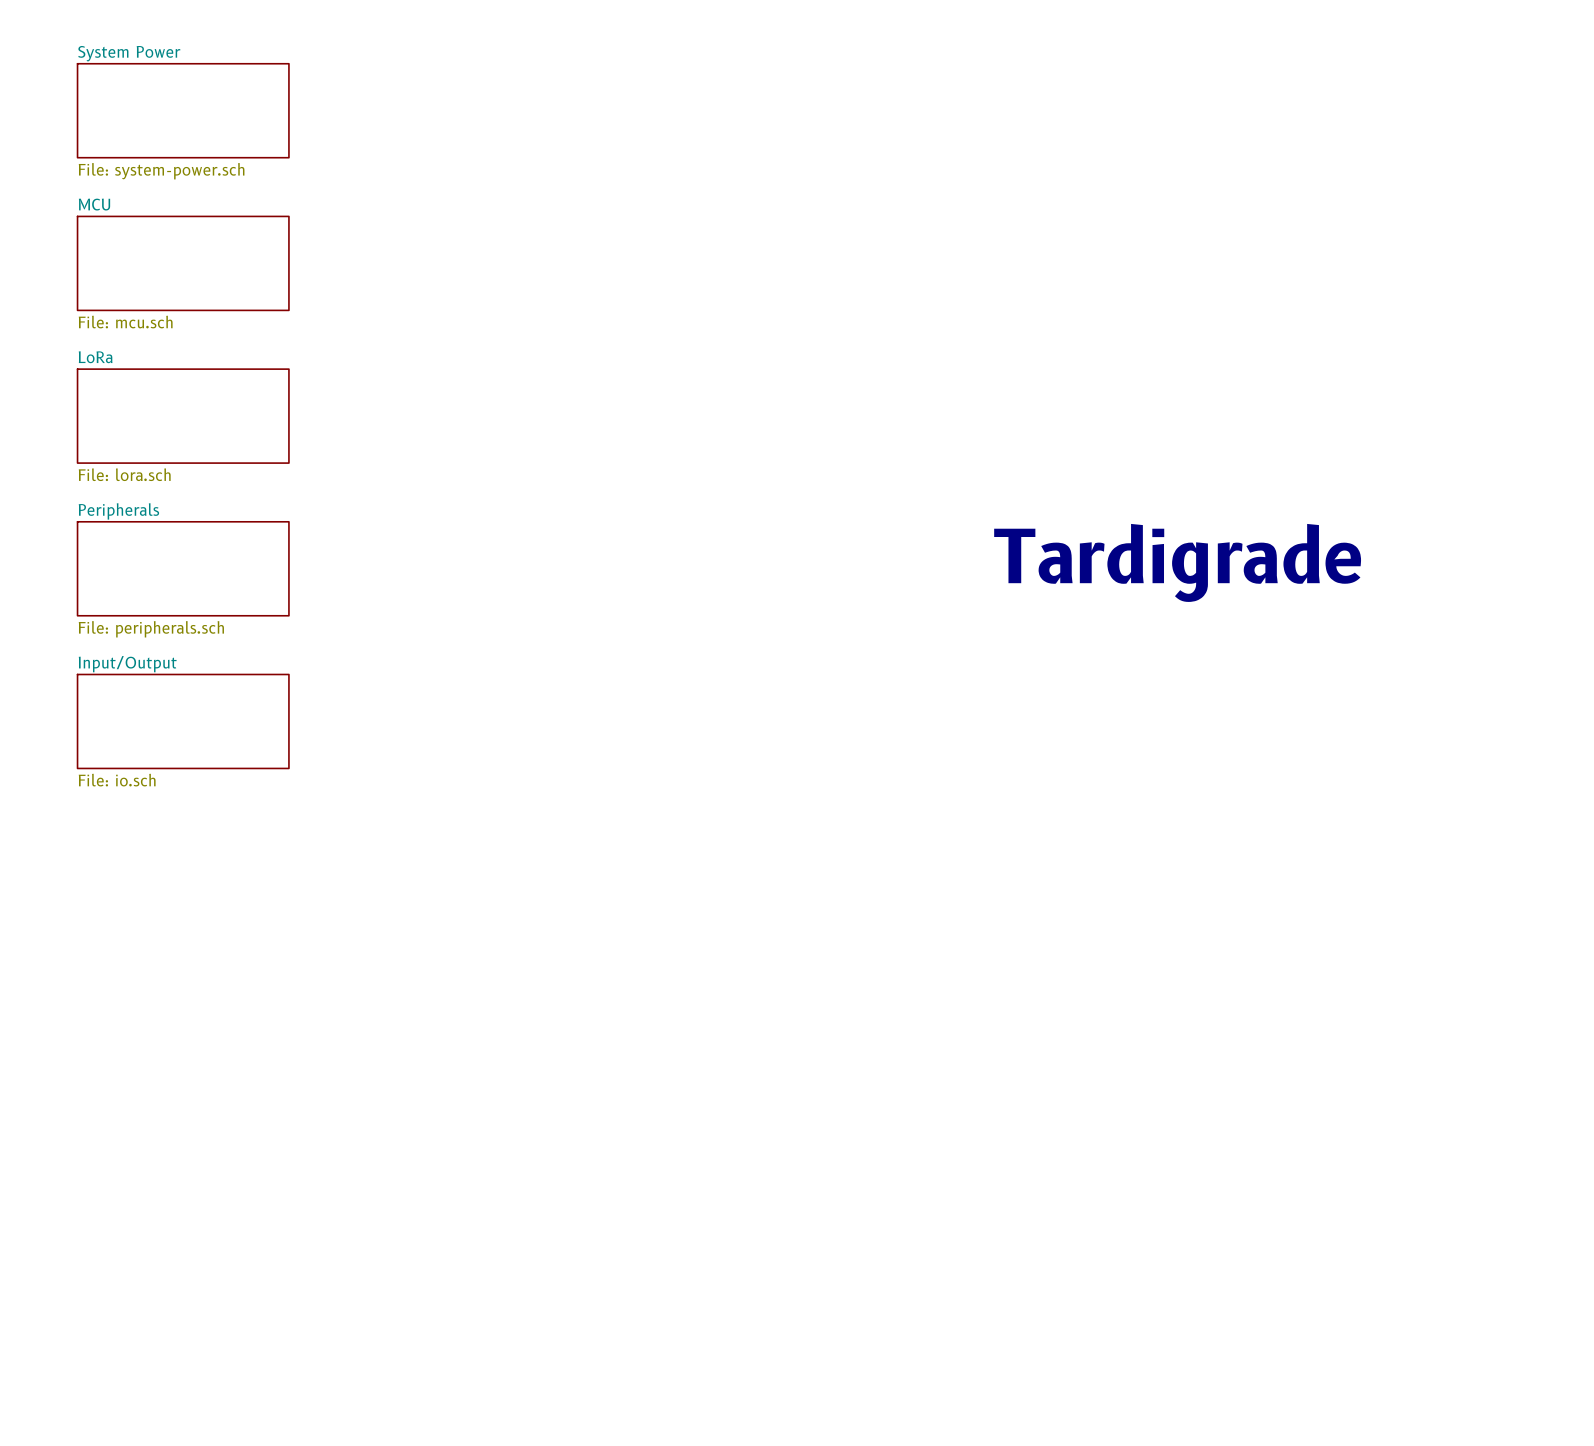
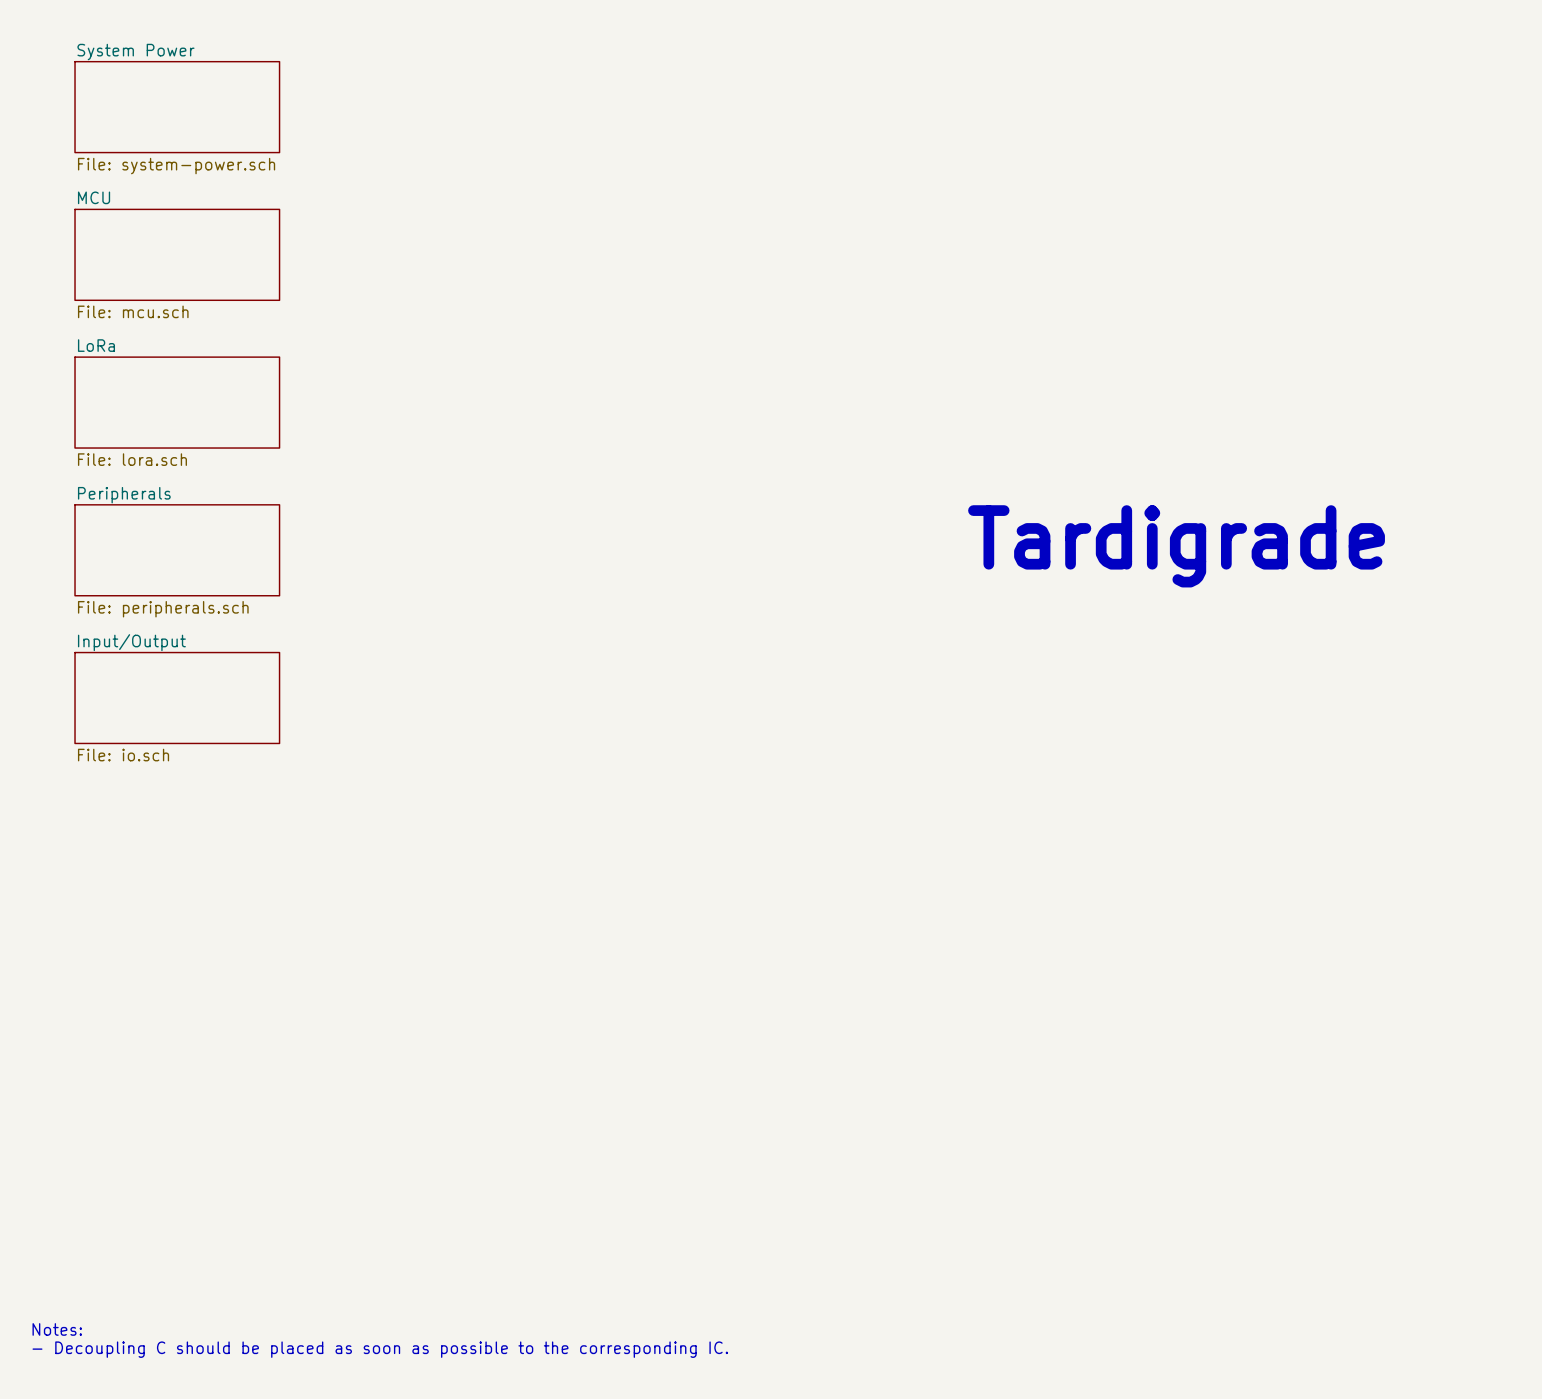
text: none -> Notes: (57, 1329)
text: none -> - Decoupling C should be placed as soon as possible to the corresponding IC. (380, 1349)

